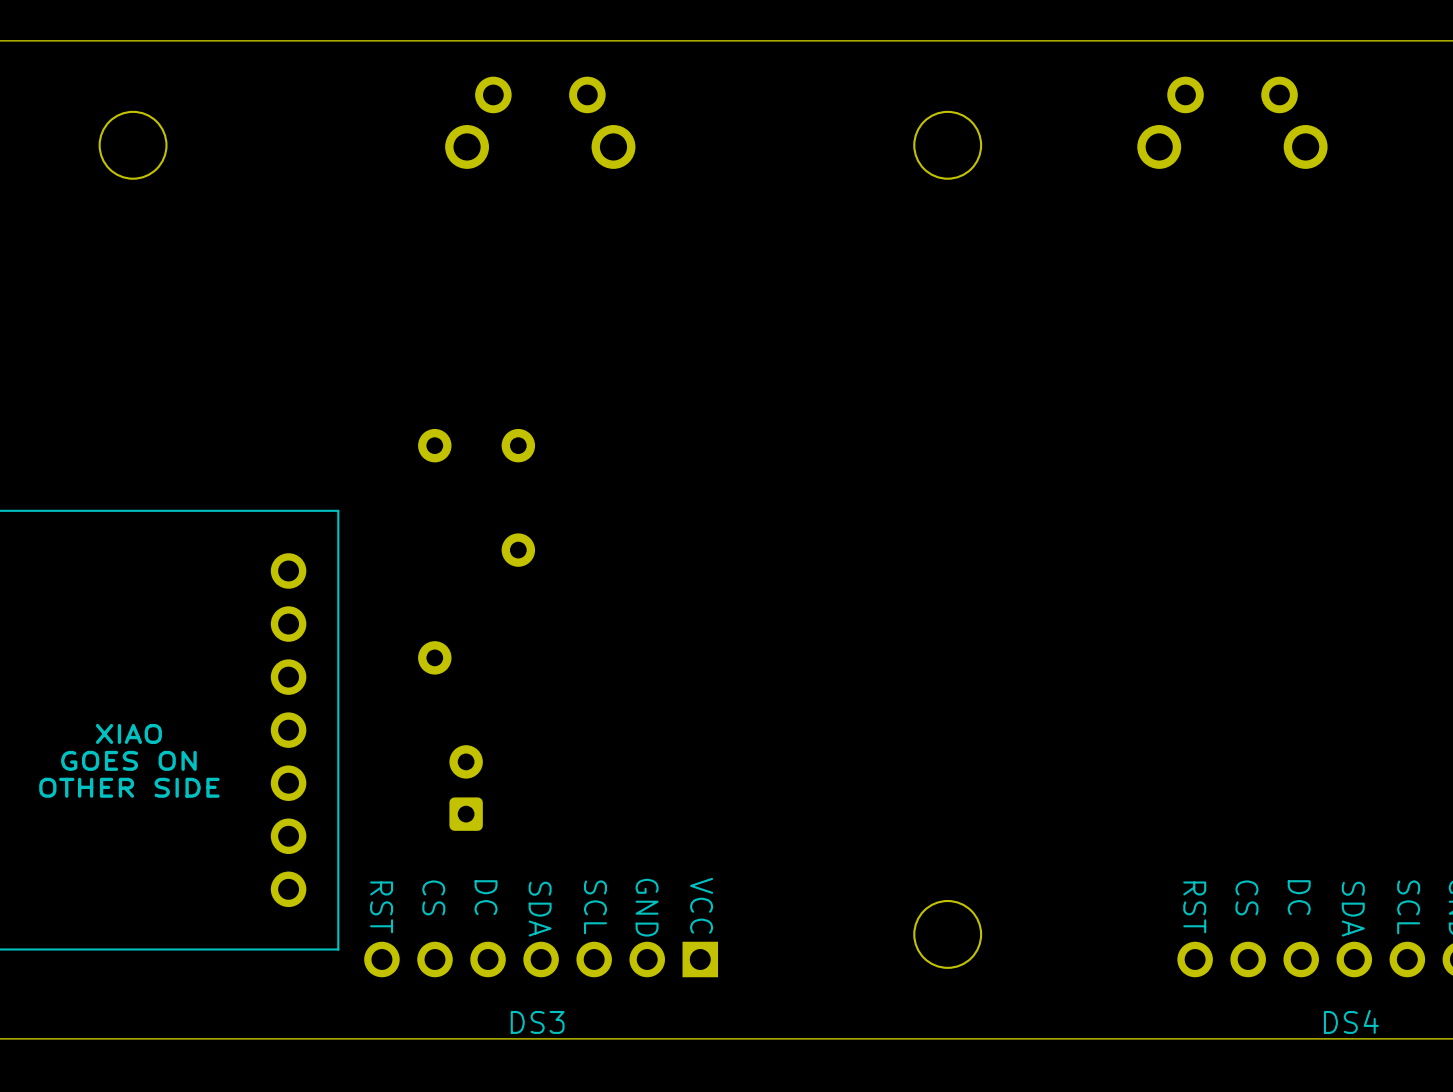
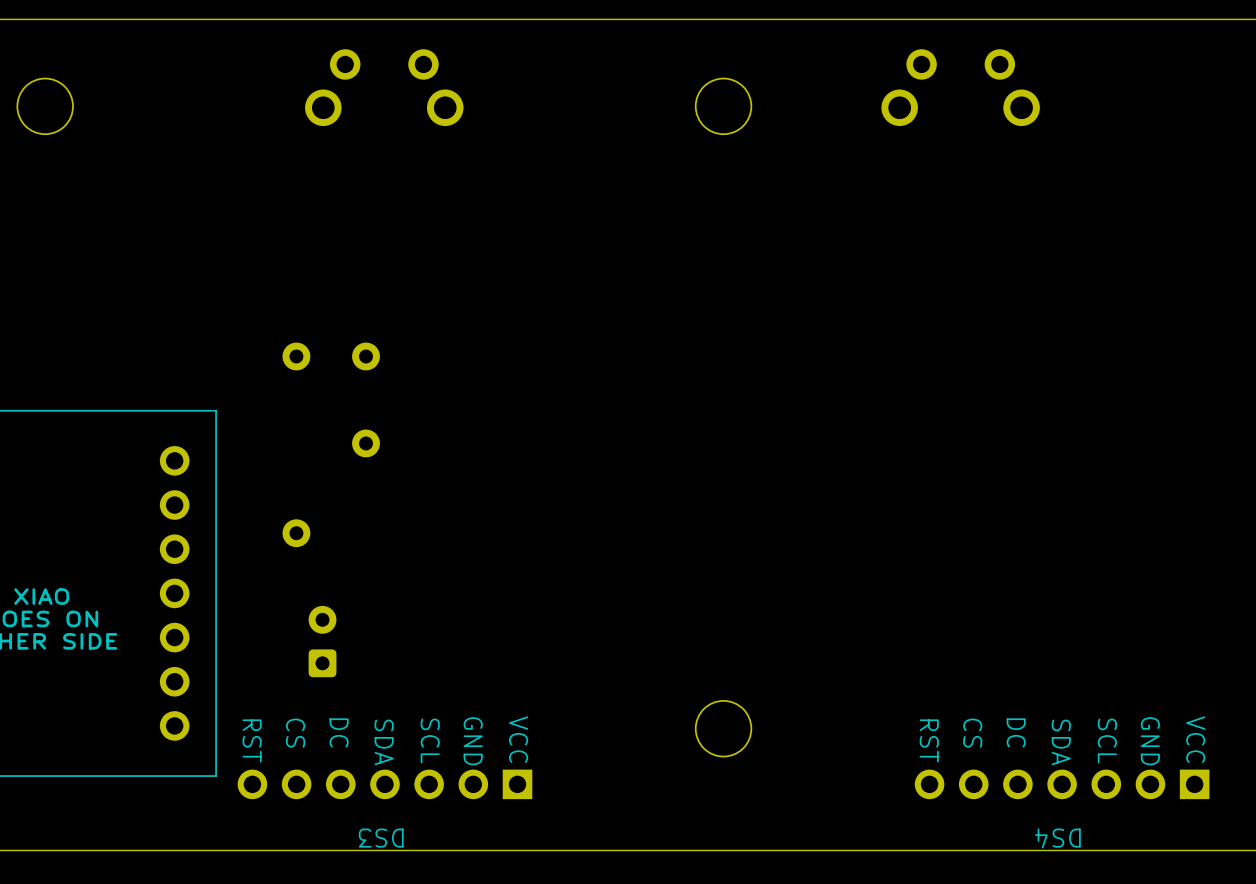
round board edge position: (947, 934) -> (723, 728)
DS4 name rotation: 0° (1351, 1021) -> 180° (1057, 838)
DS3 name rotation: 0° (537, 1022) -> 180° (381, 838)

